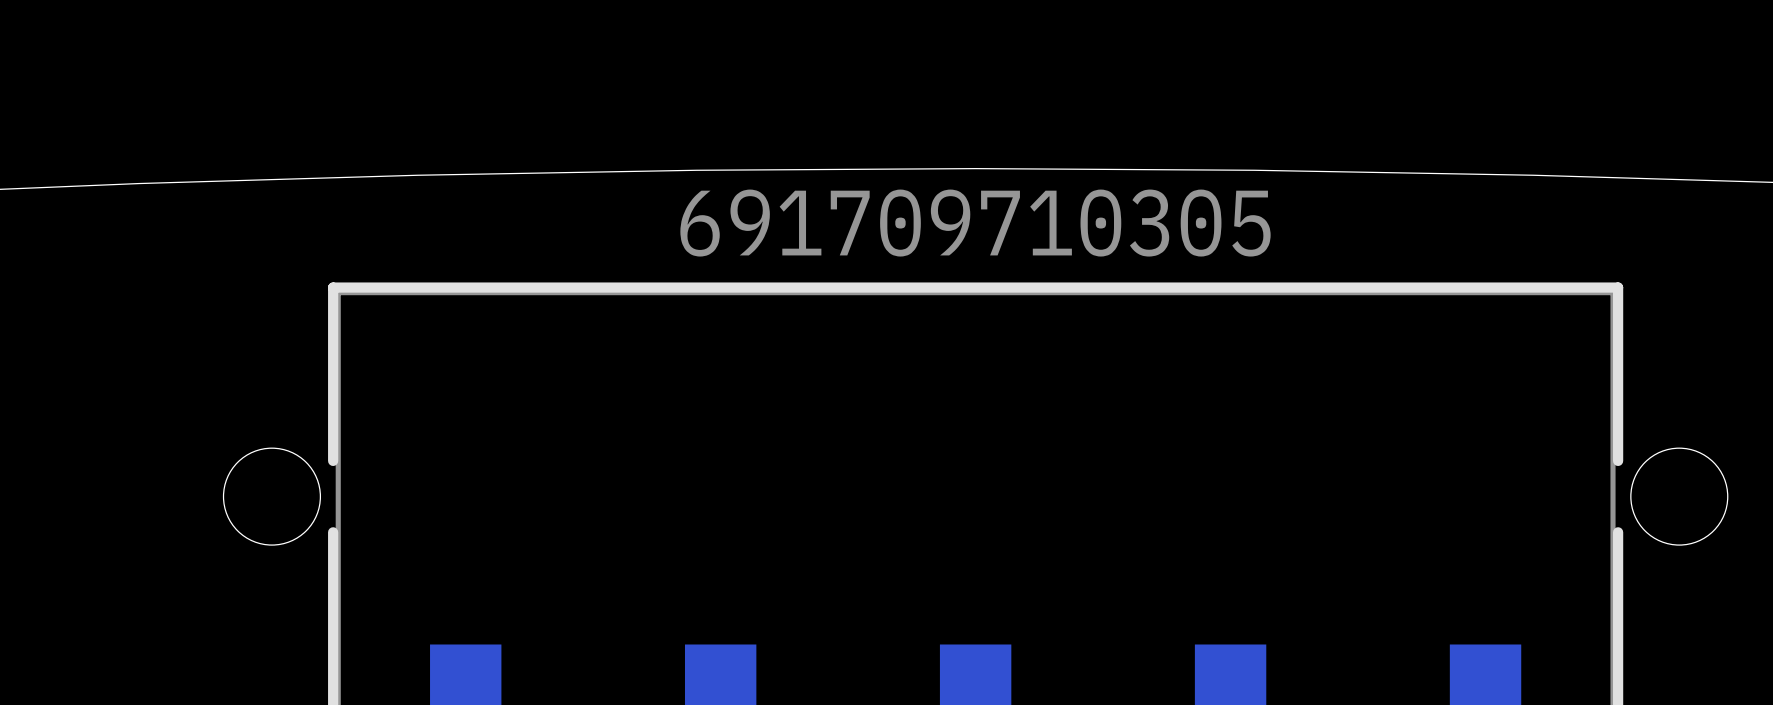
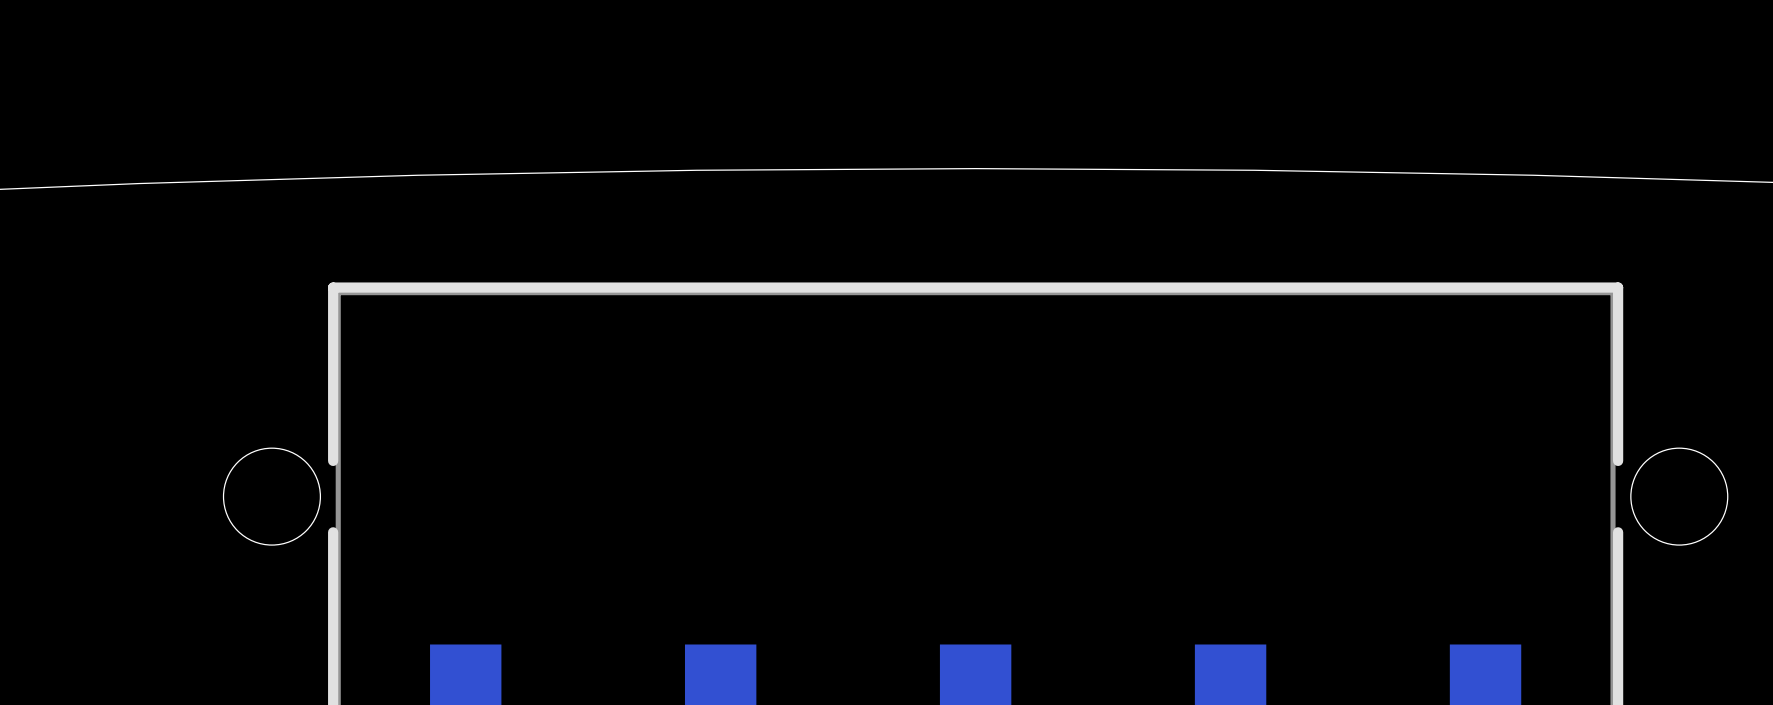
part value: 691709710305 (975, 223) -> none

